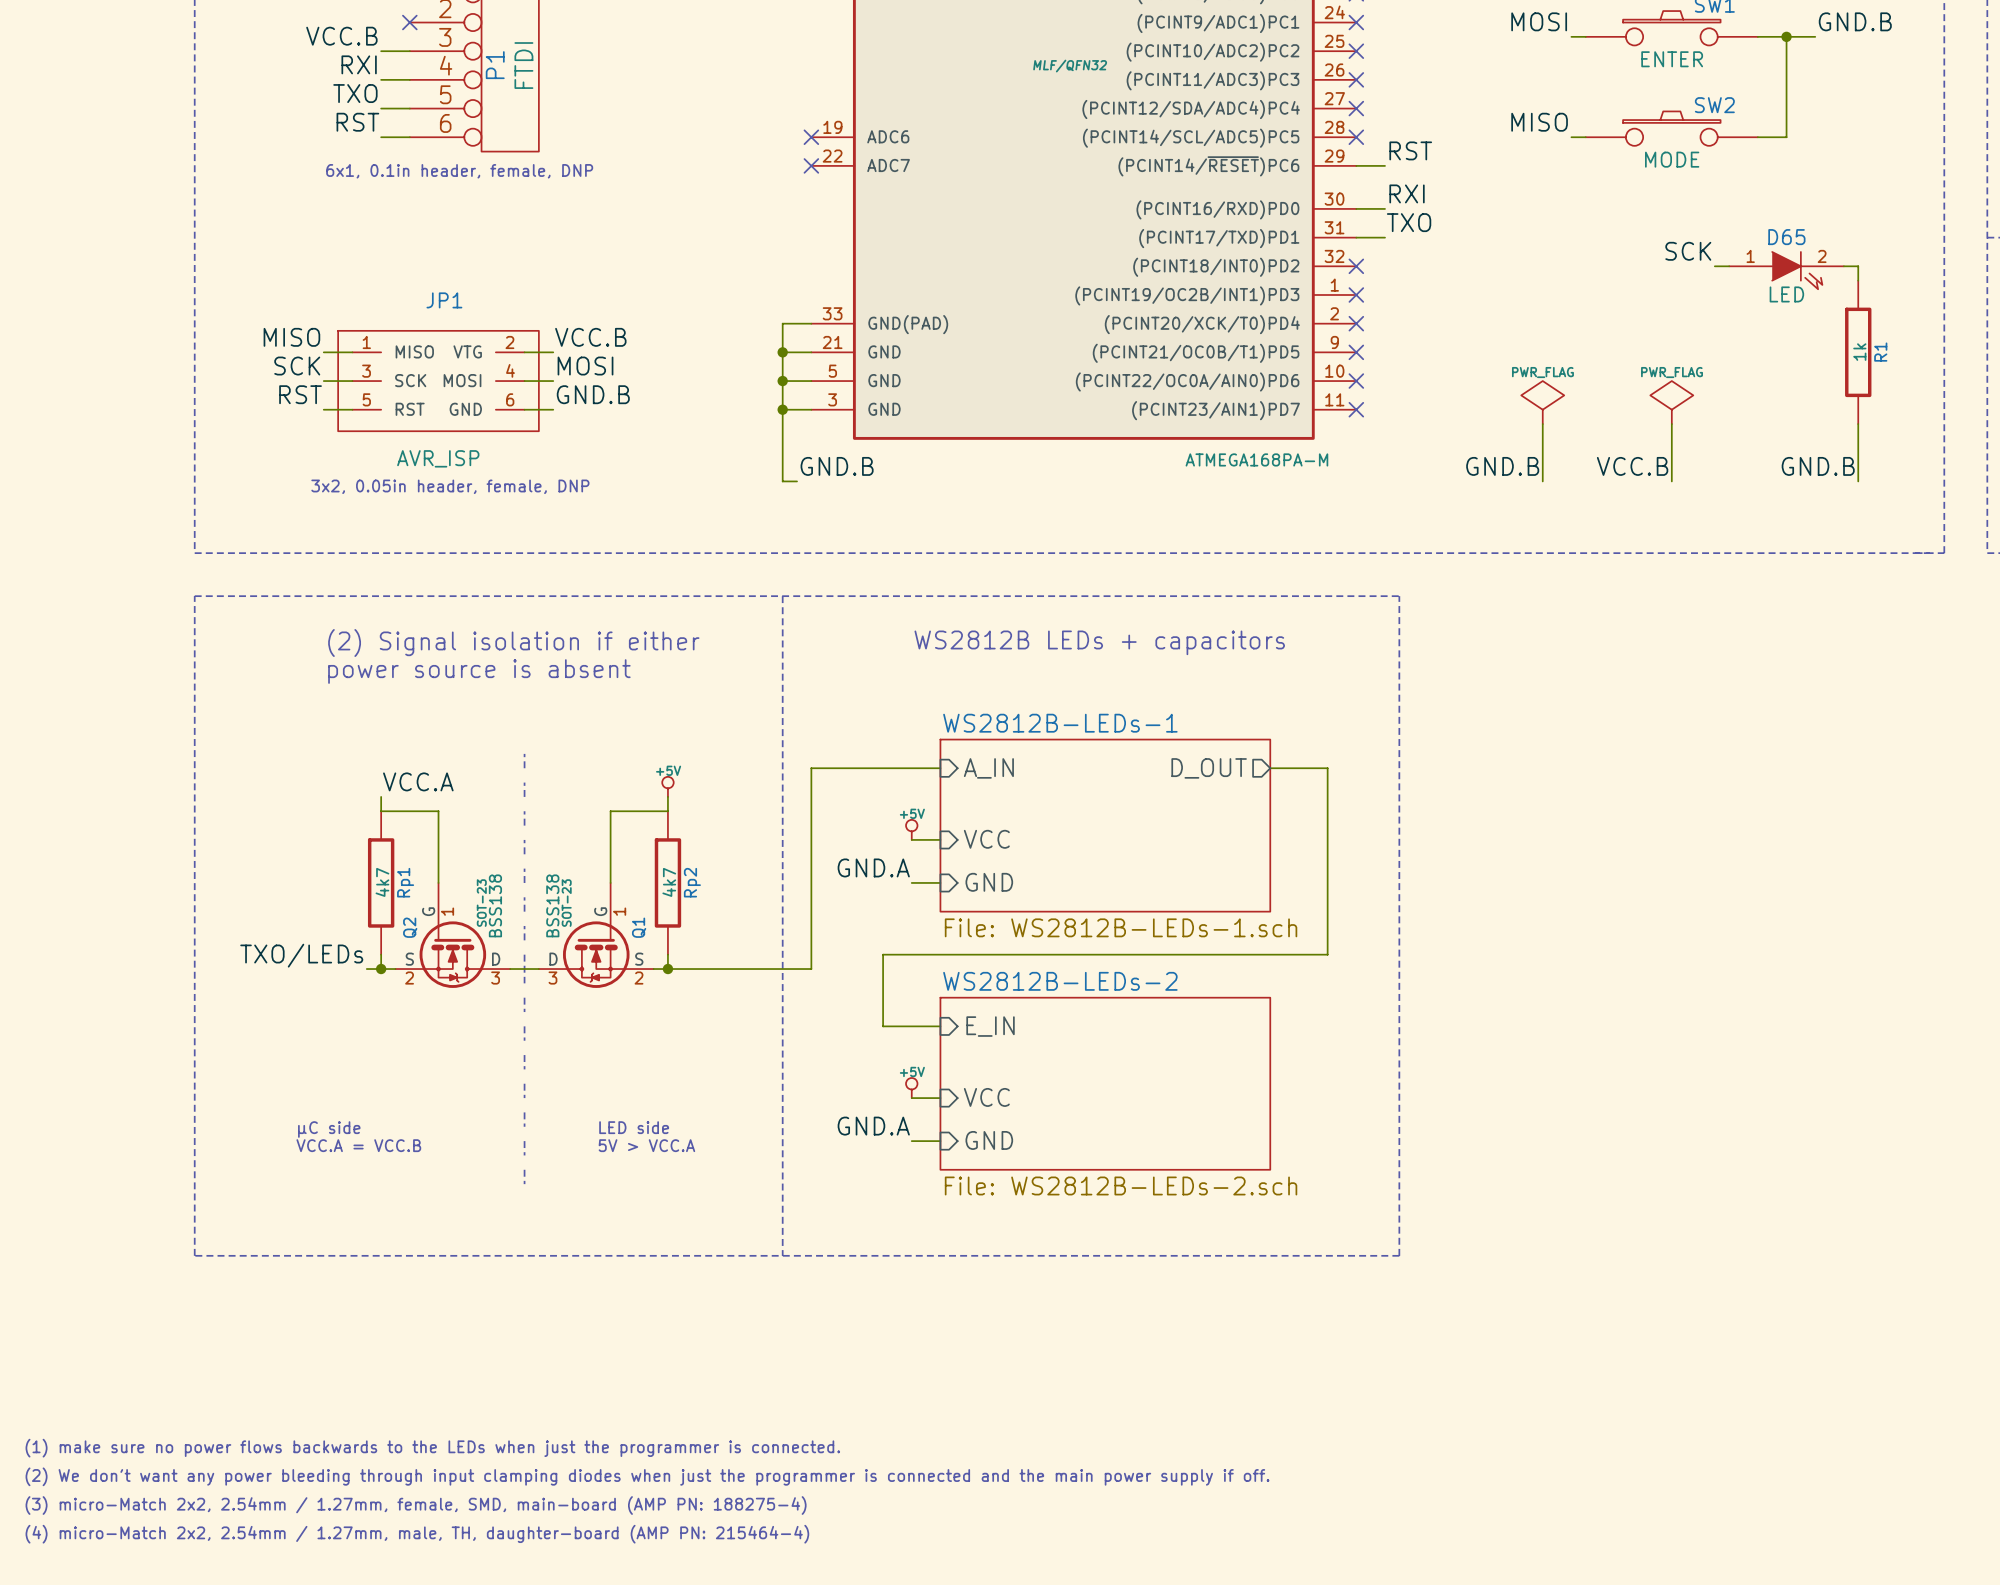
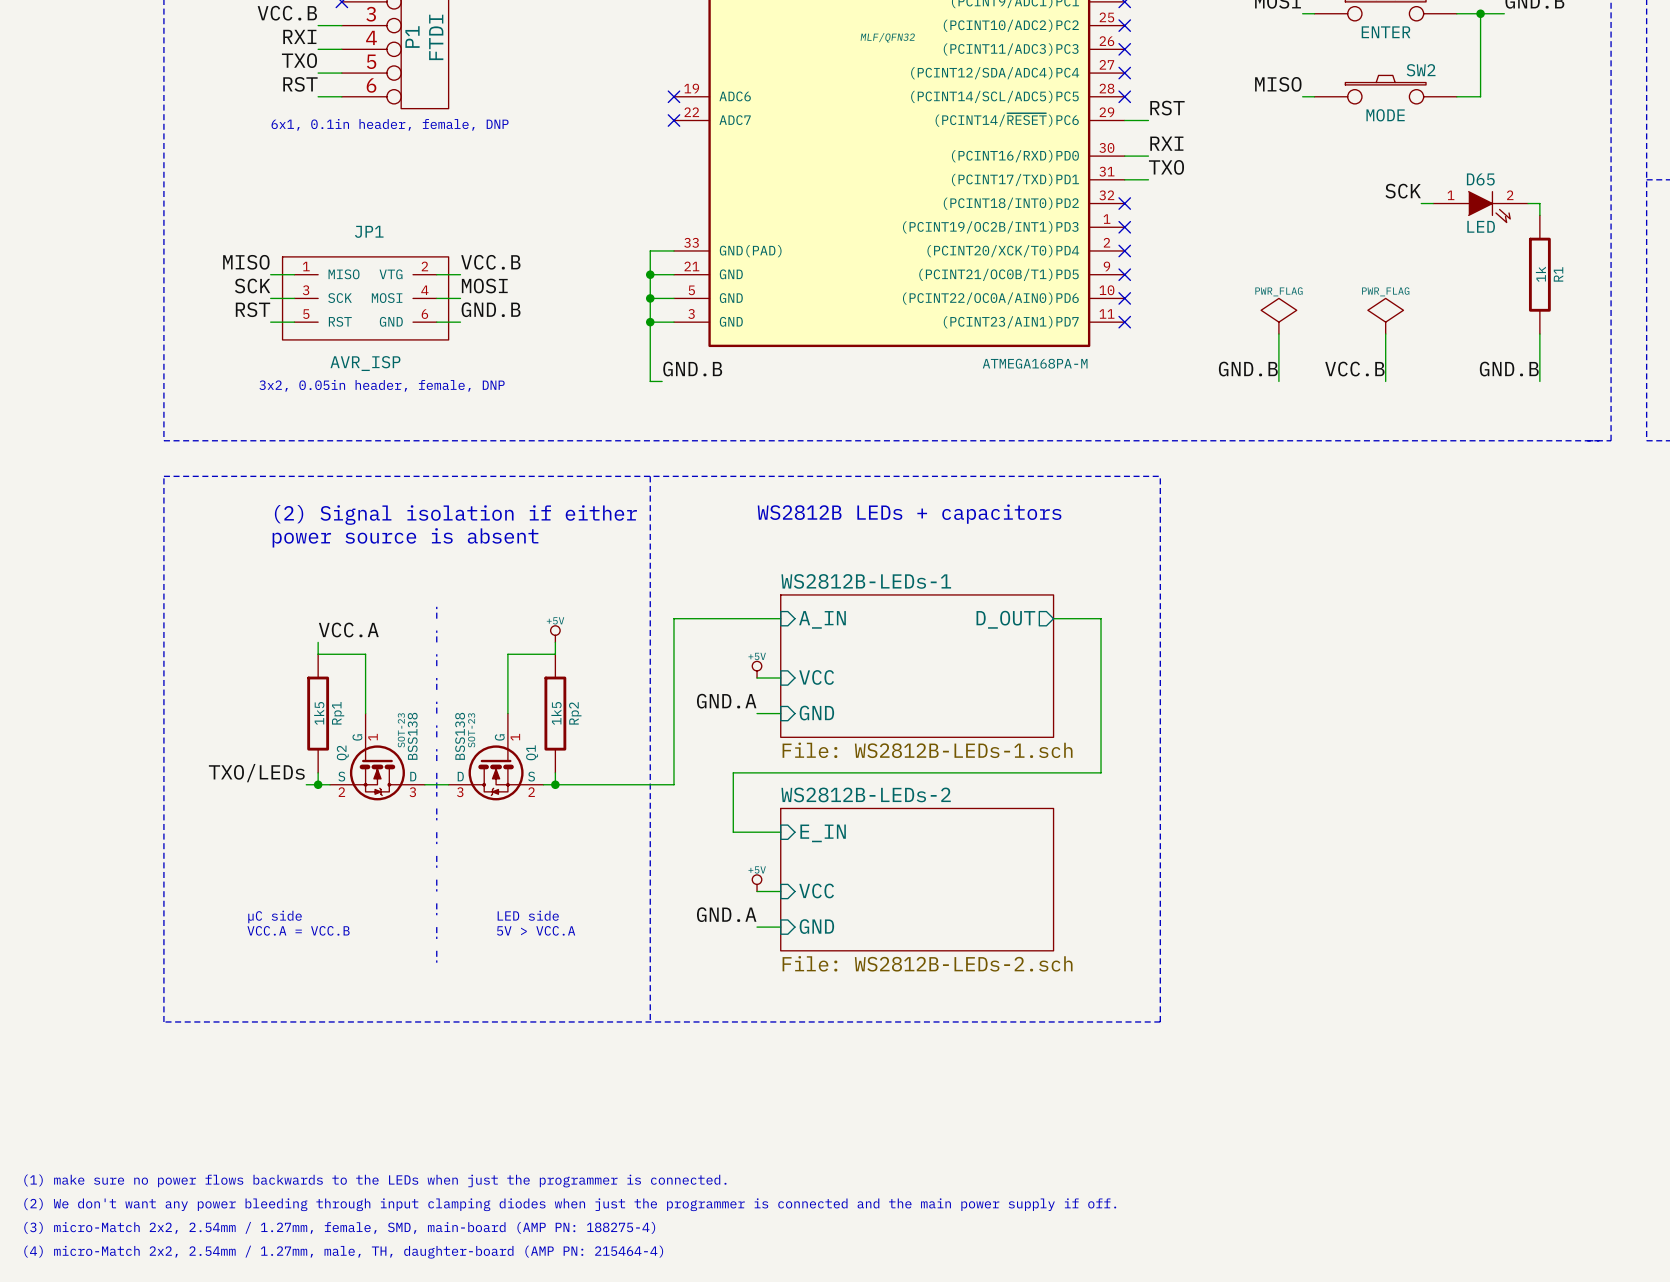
Rp1 value: 4k7 (382, 882) -> 1k5 (319, 713)
Rp2 value: 4k7 (669, 882) -> 1k5 (556, 713)

